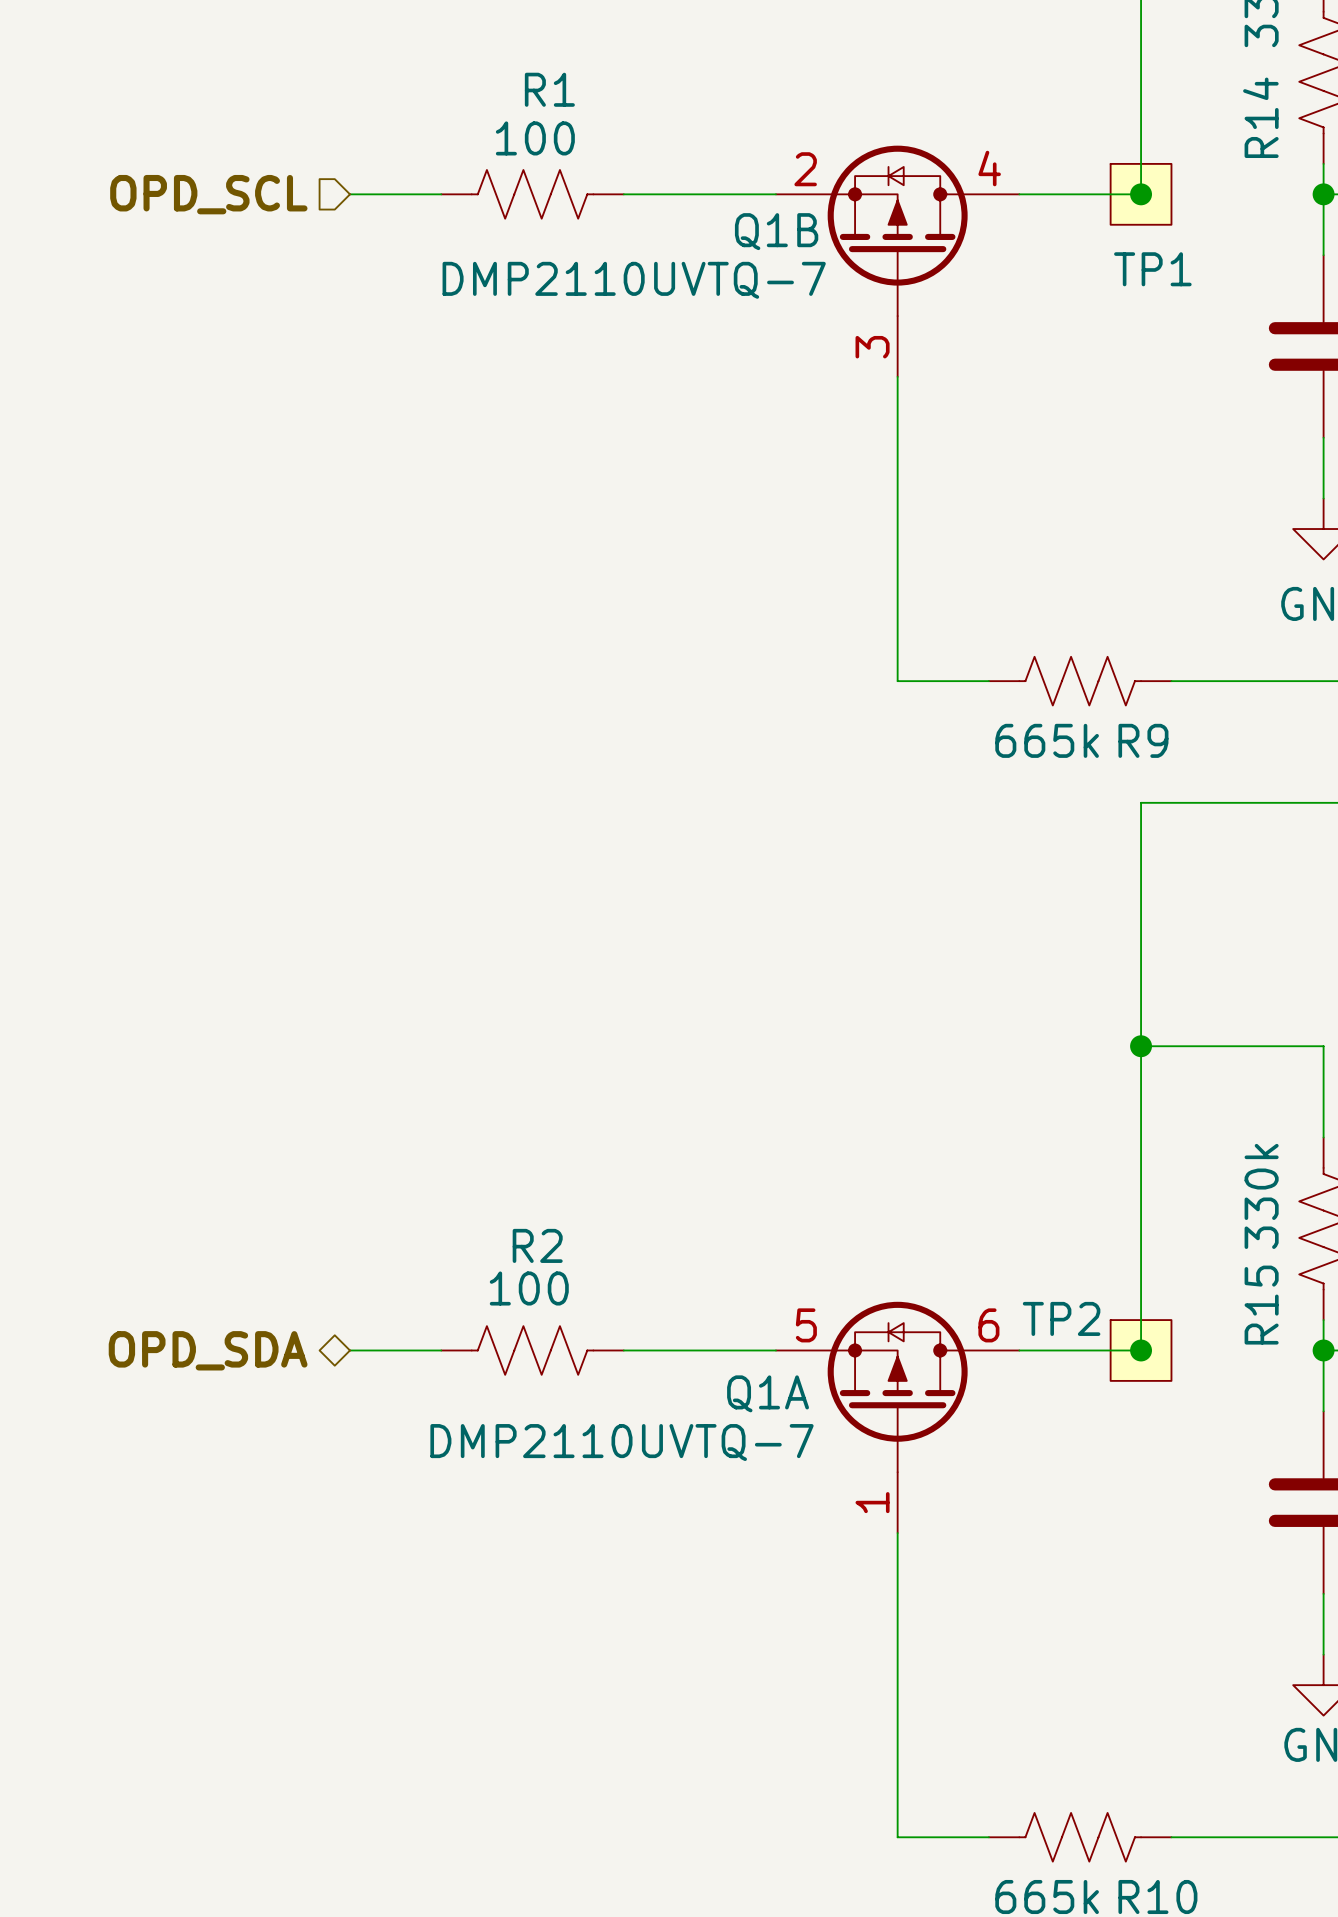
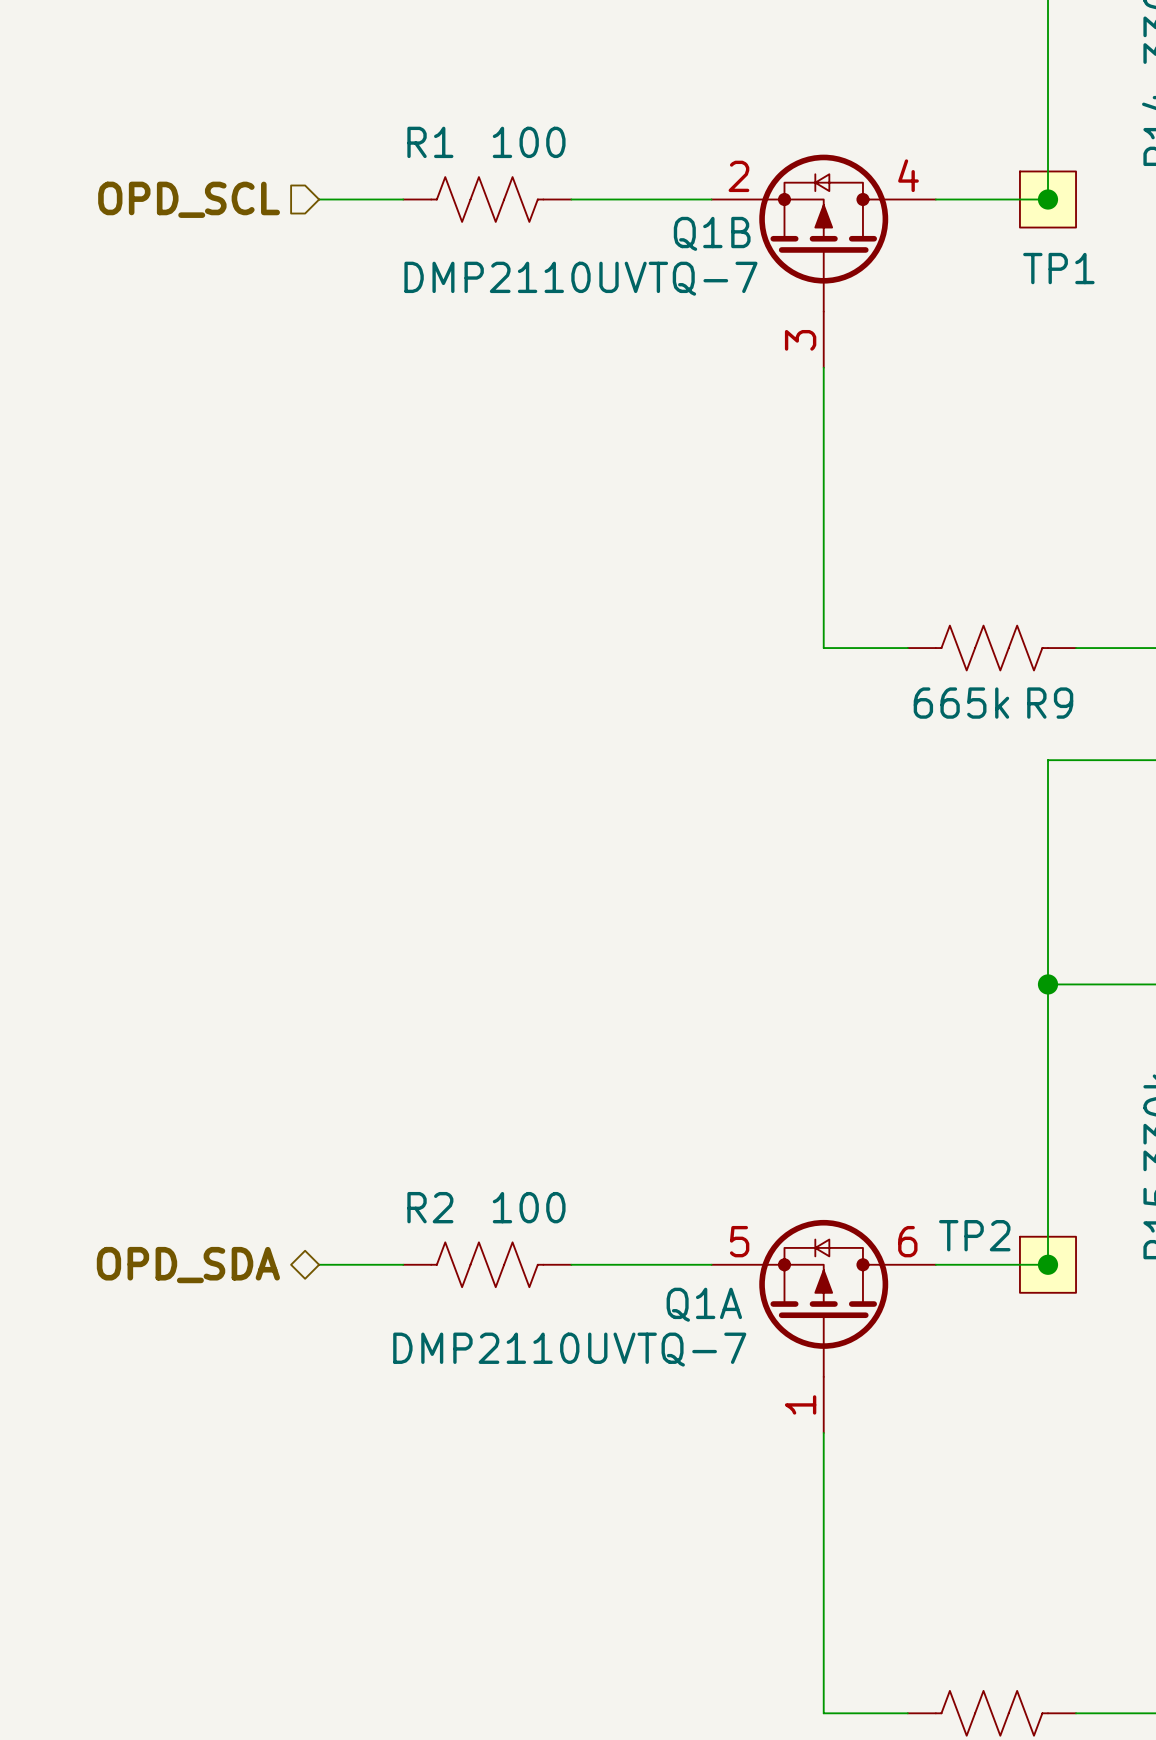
R1 name position: R1 (549, 89) -> R1 (430, 142)
R1 value position: 100 (535, 138) -> 100 (529, 142)
R2 name position: R2 (537, 1245) -> R2 (430, 1207)
R2 value position: 100 (529, 1288) -> 100 (529, 1207)

